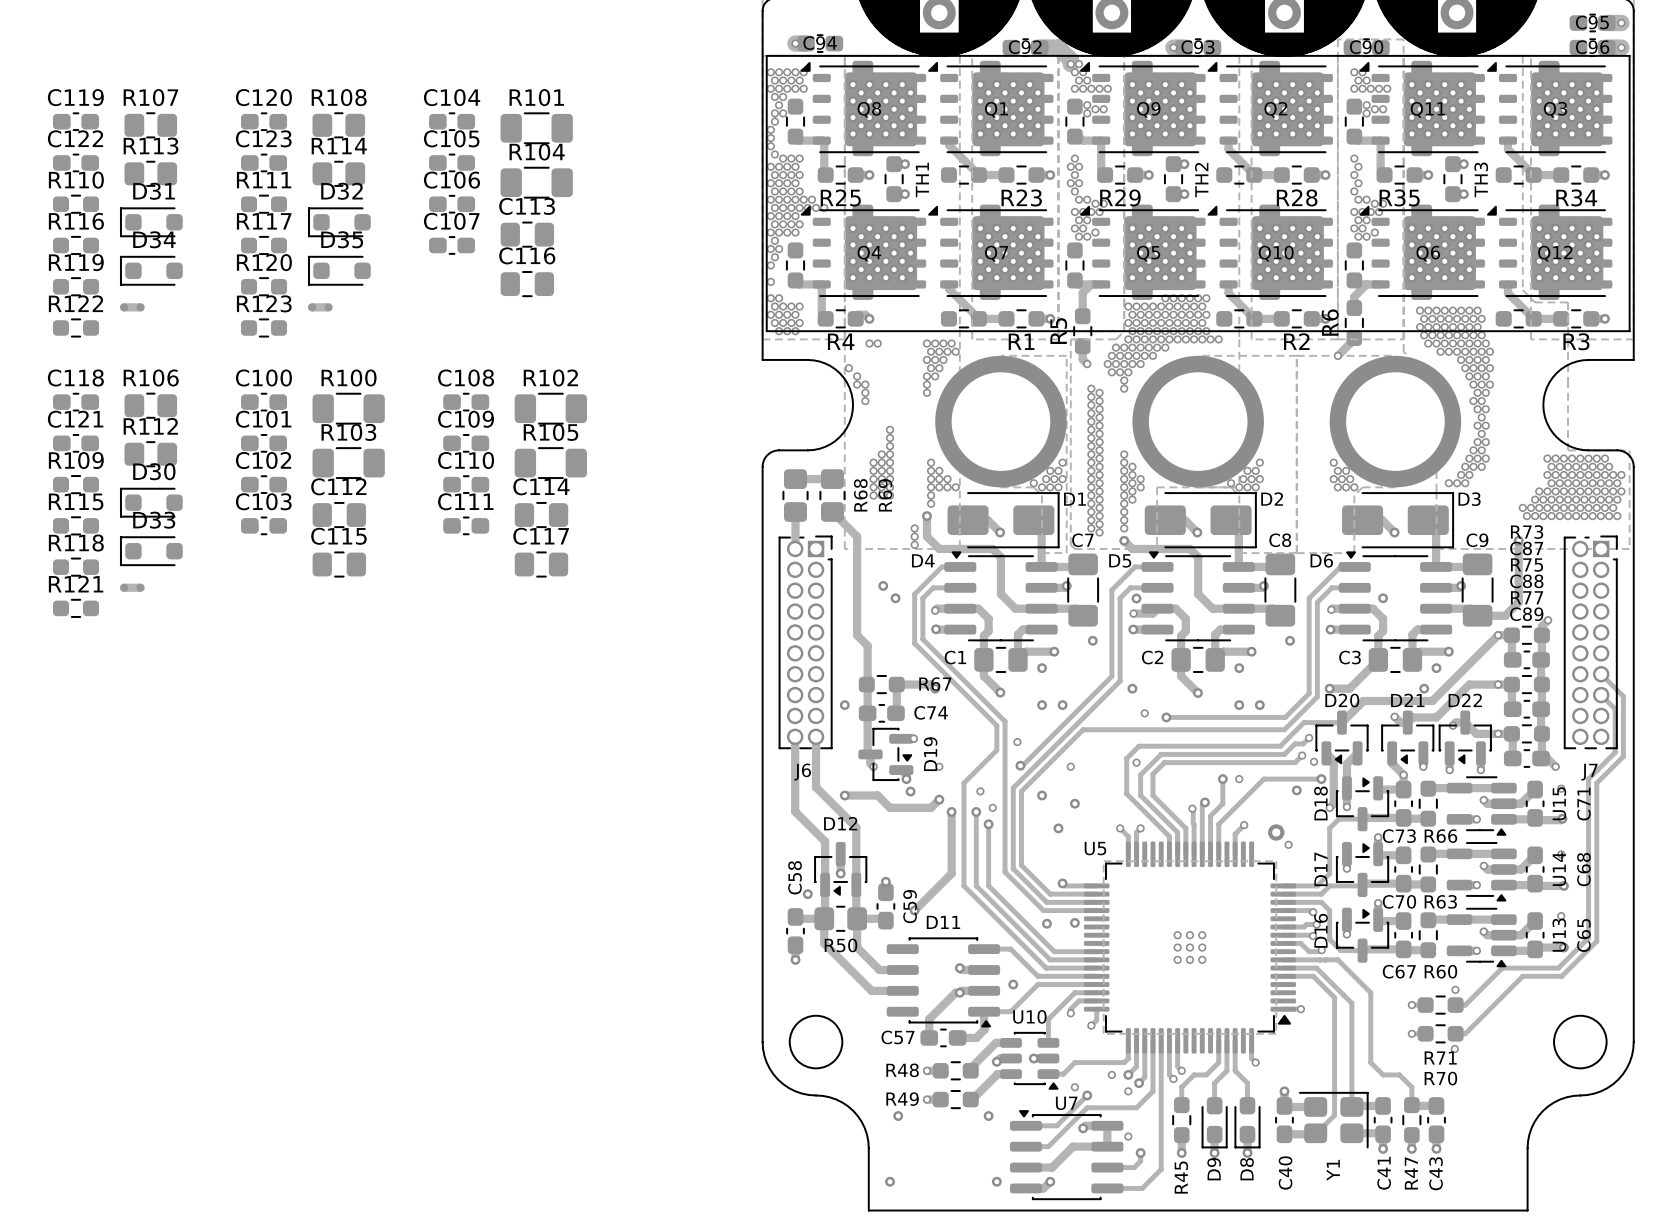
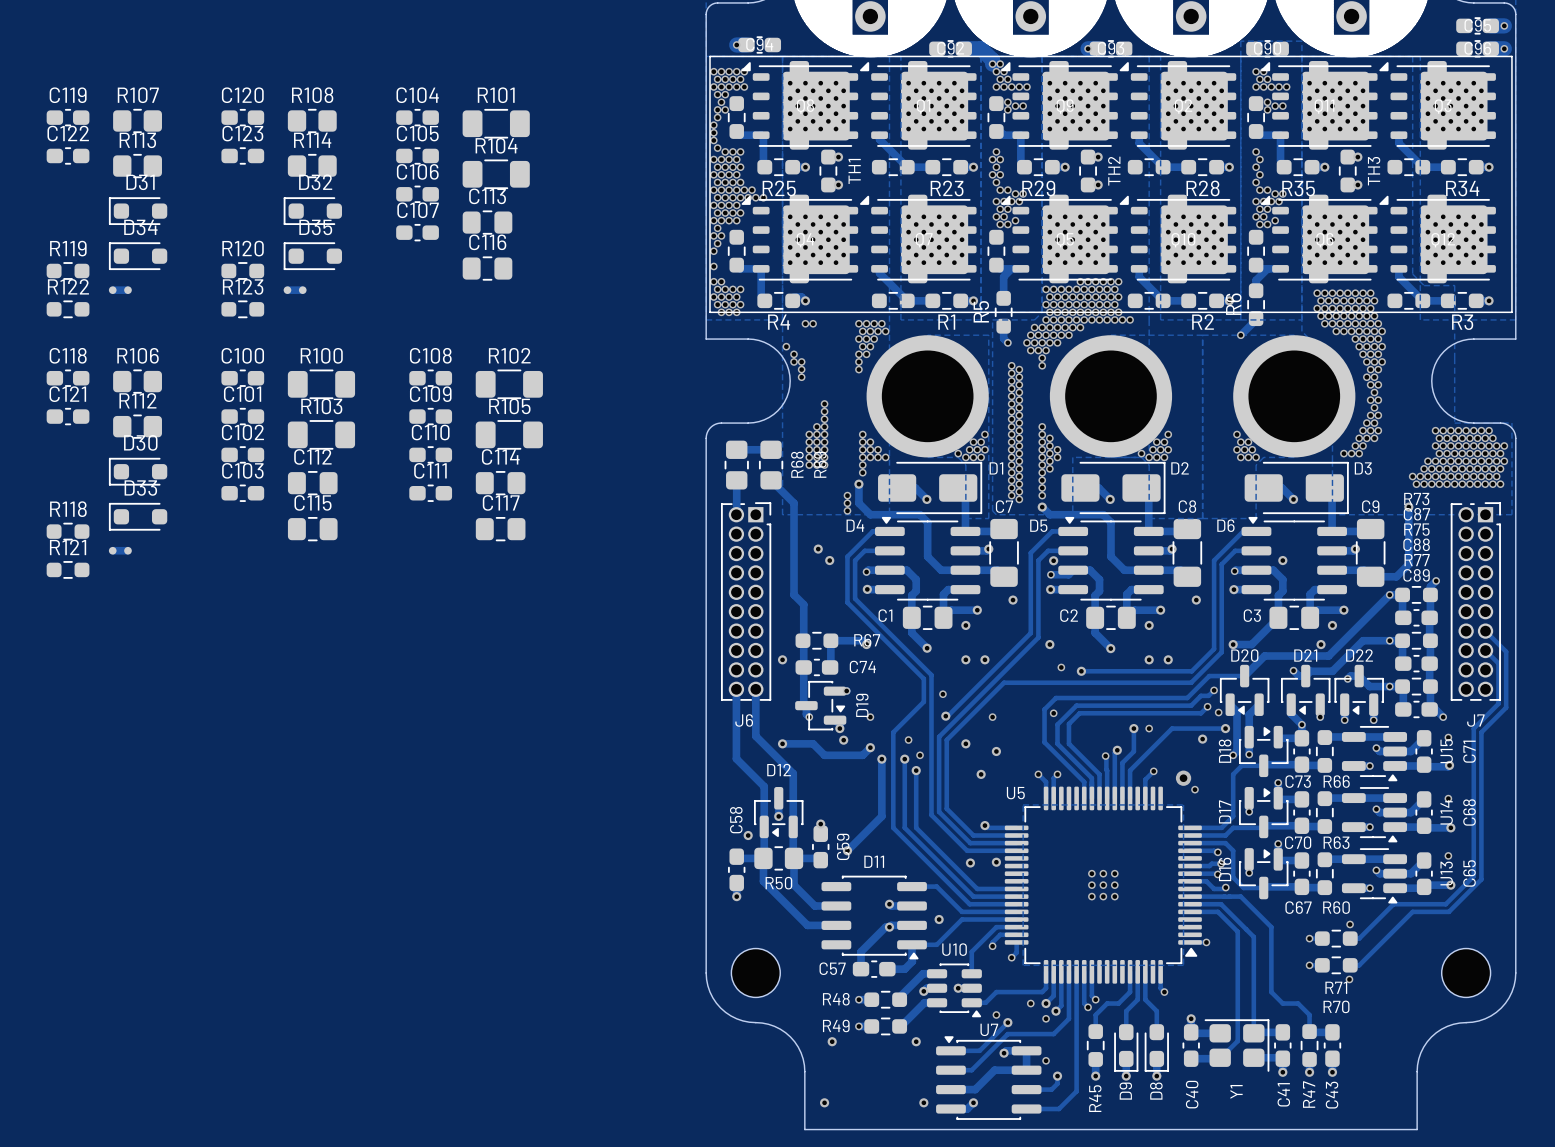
R110: (76, 204) -> none
R111: (264, 204) -> none
R116: (76, 245) -> none
R117: (264, 245) -> none
R109: (76, 484) -> none
R115: (76, 525) -> none

